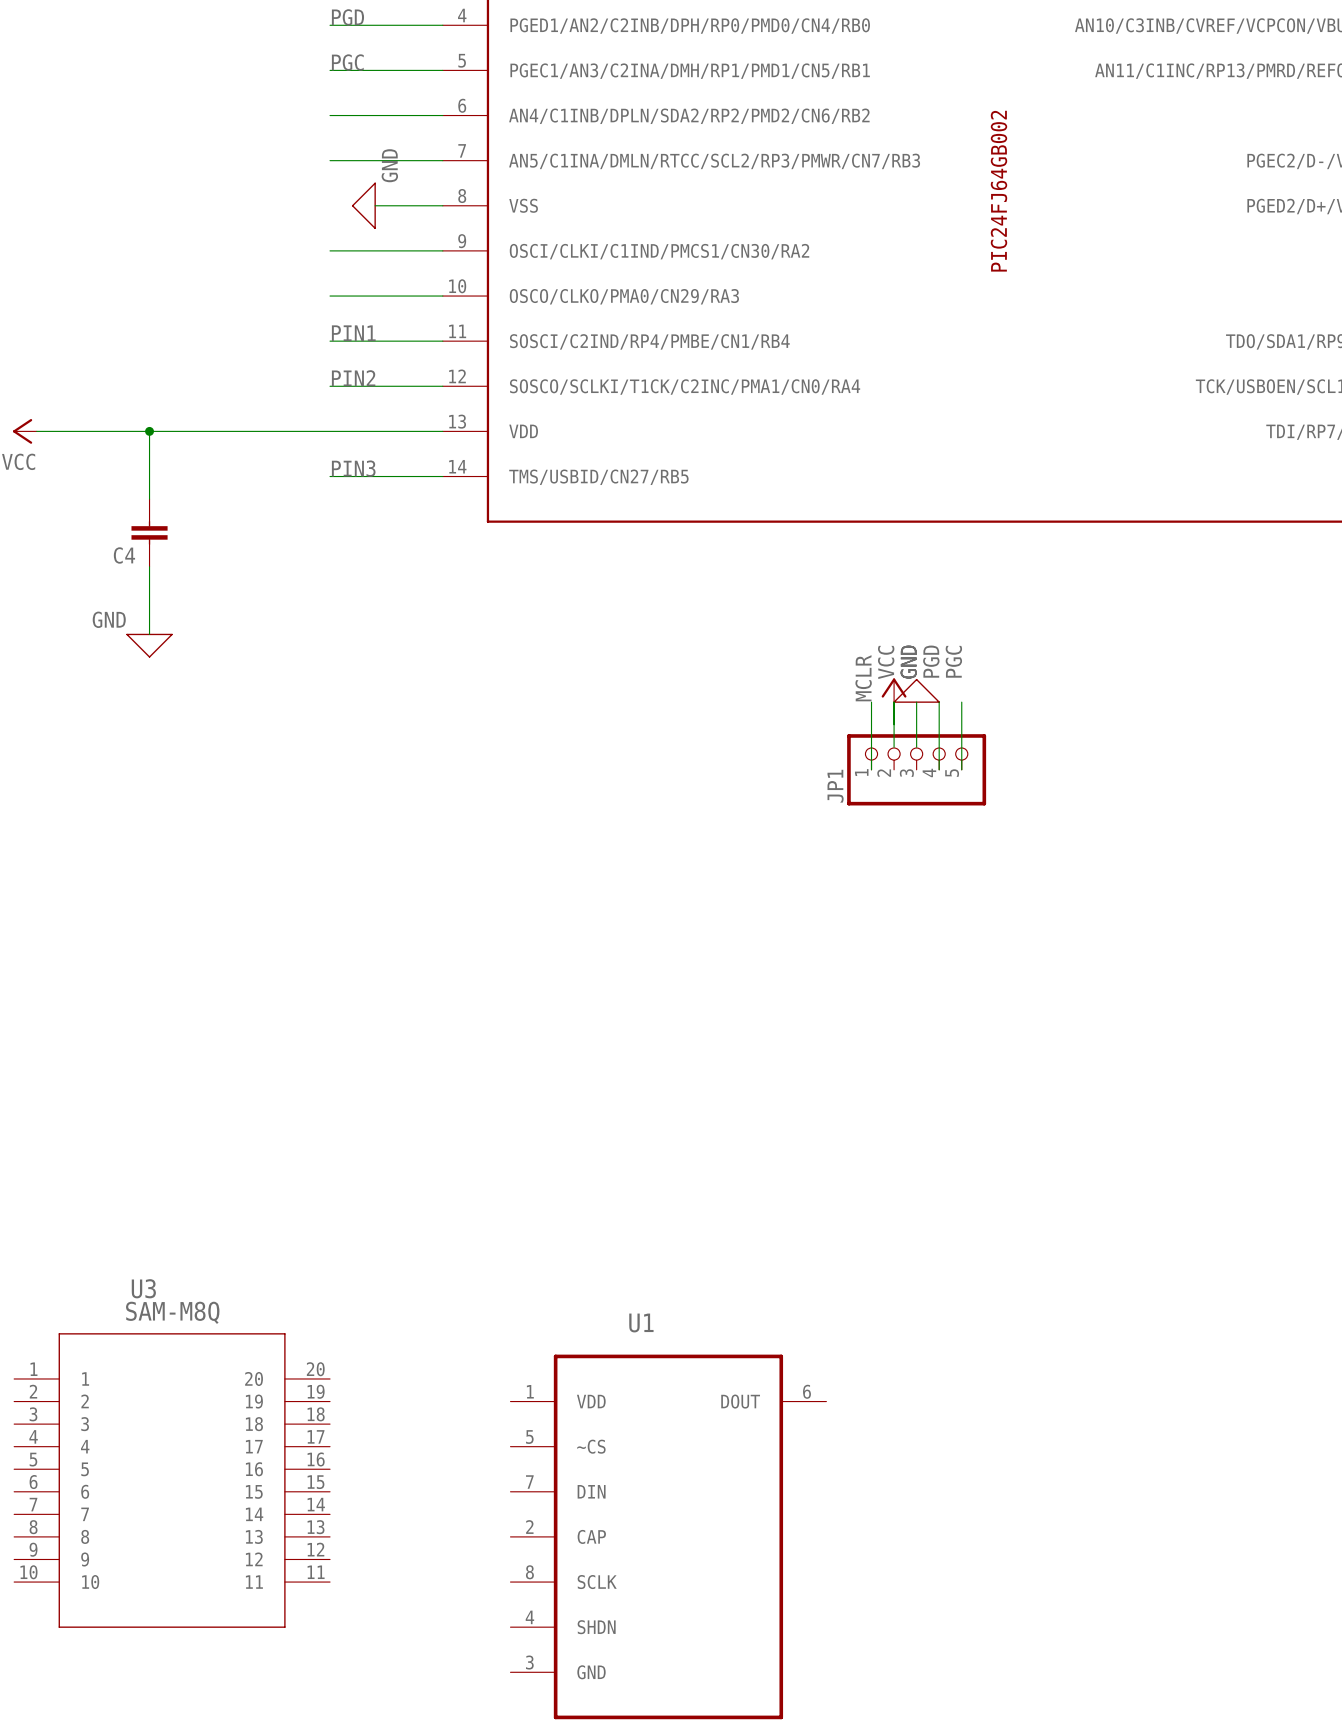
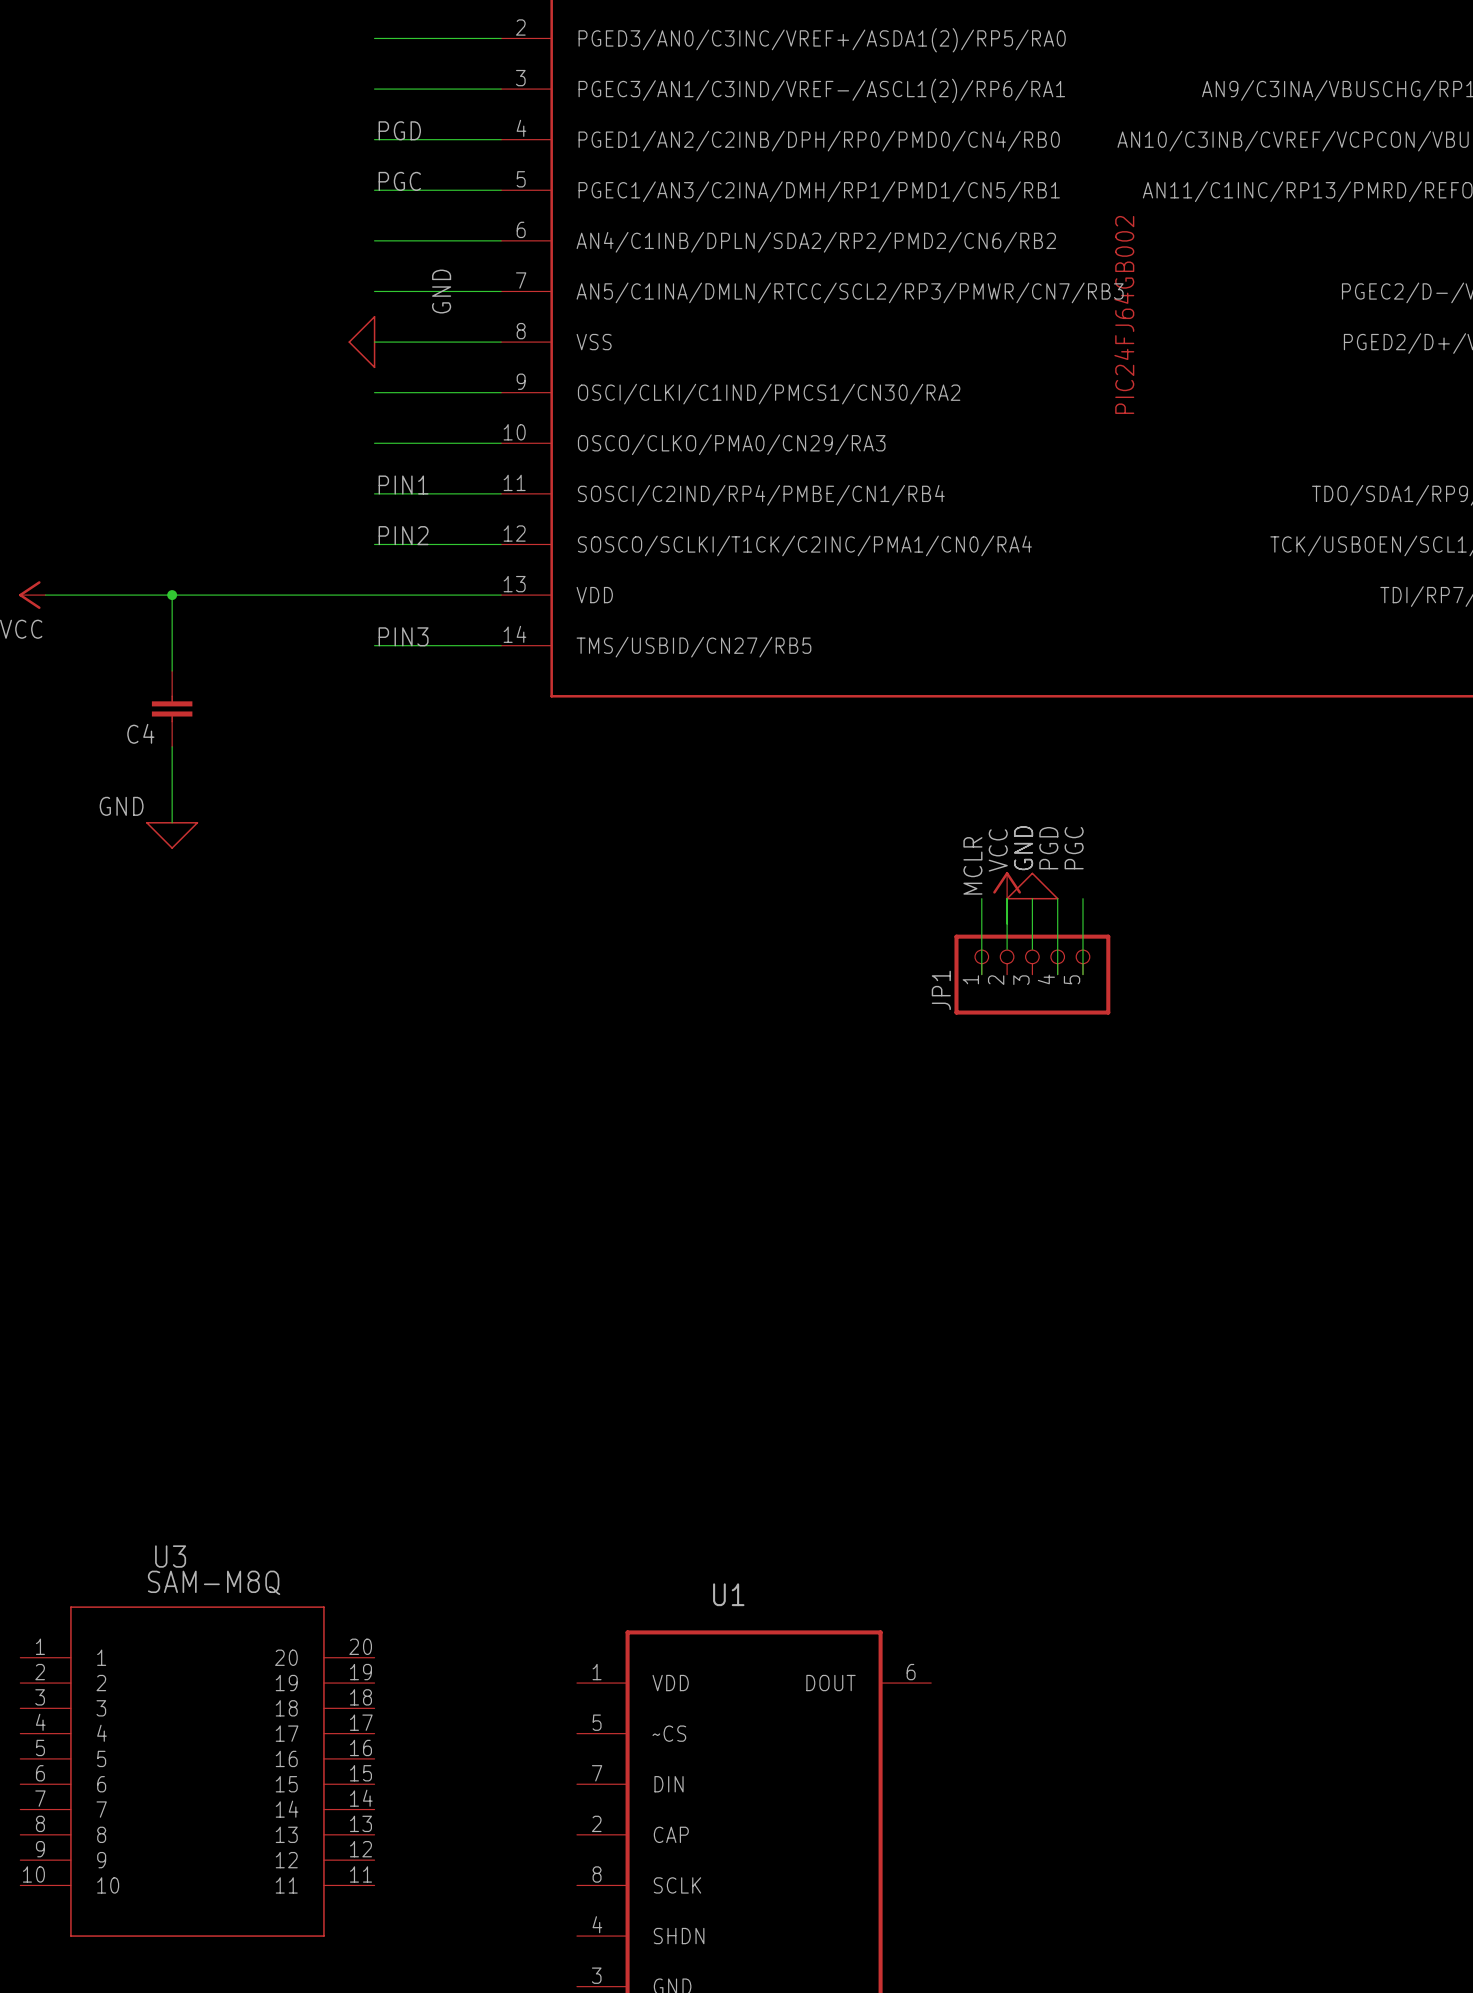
wire: none -> (374, 342) (425, 342)
power symbol position: (363, 205) -> (361, 342)

